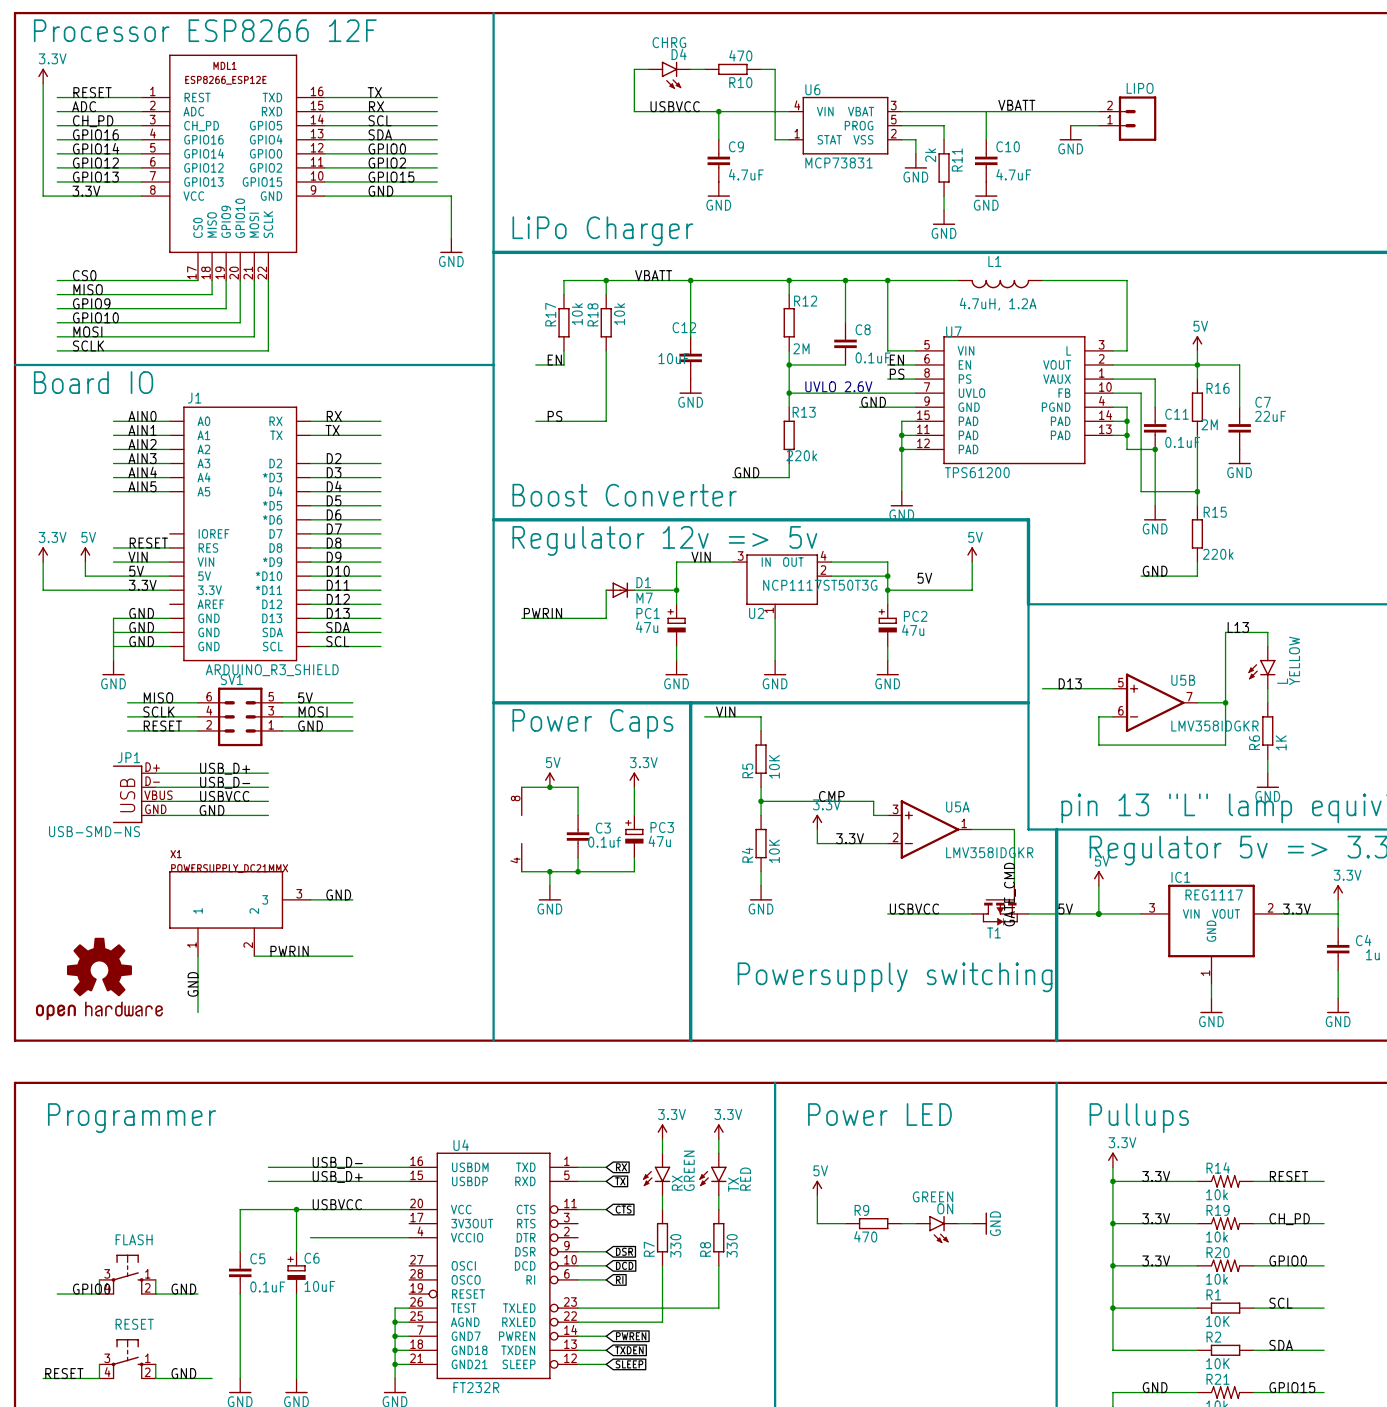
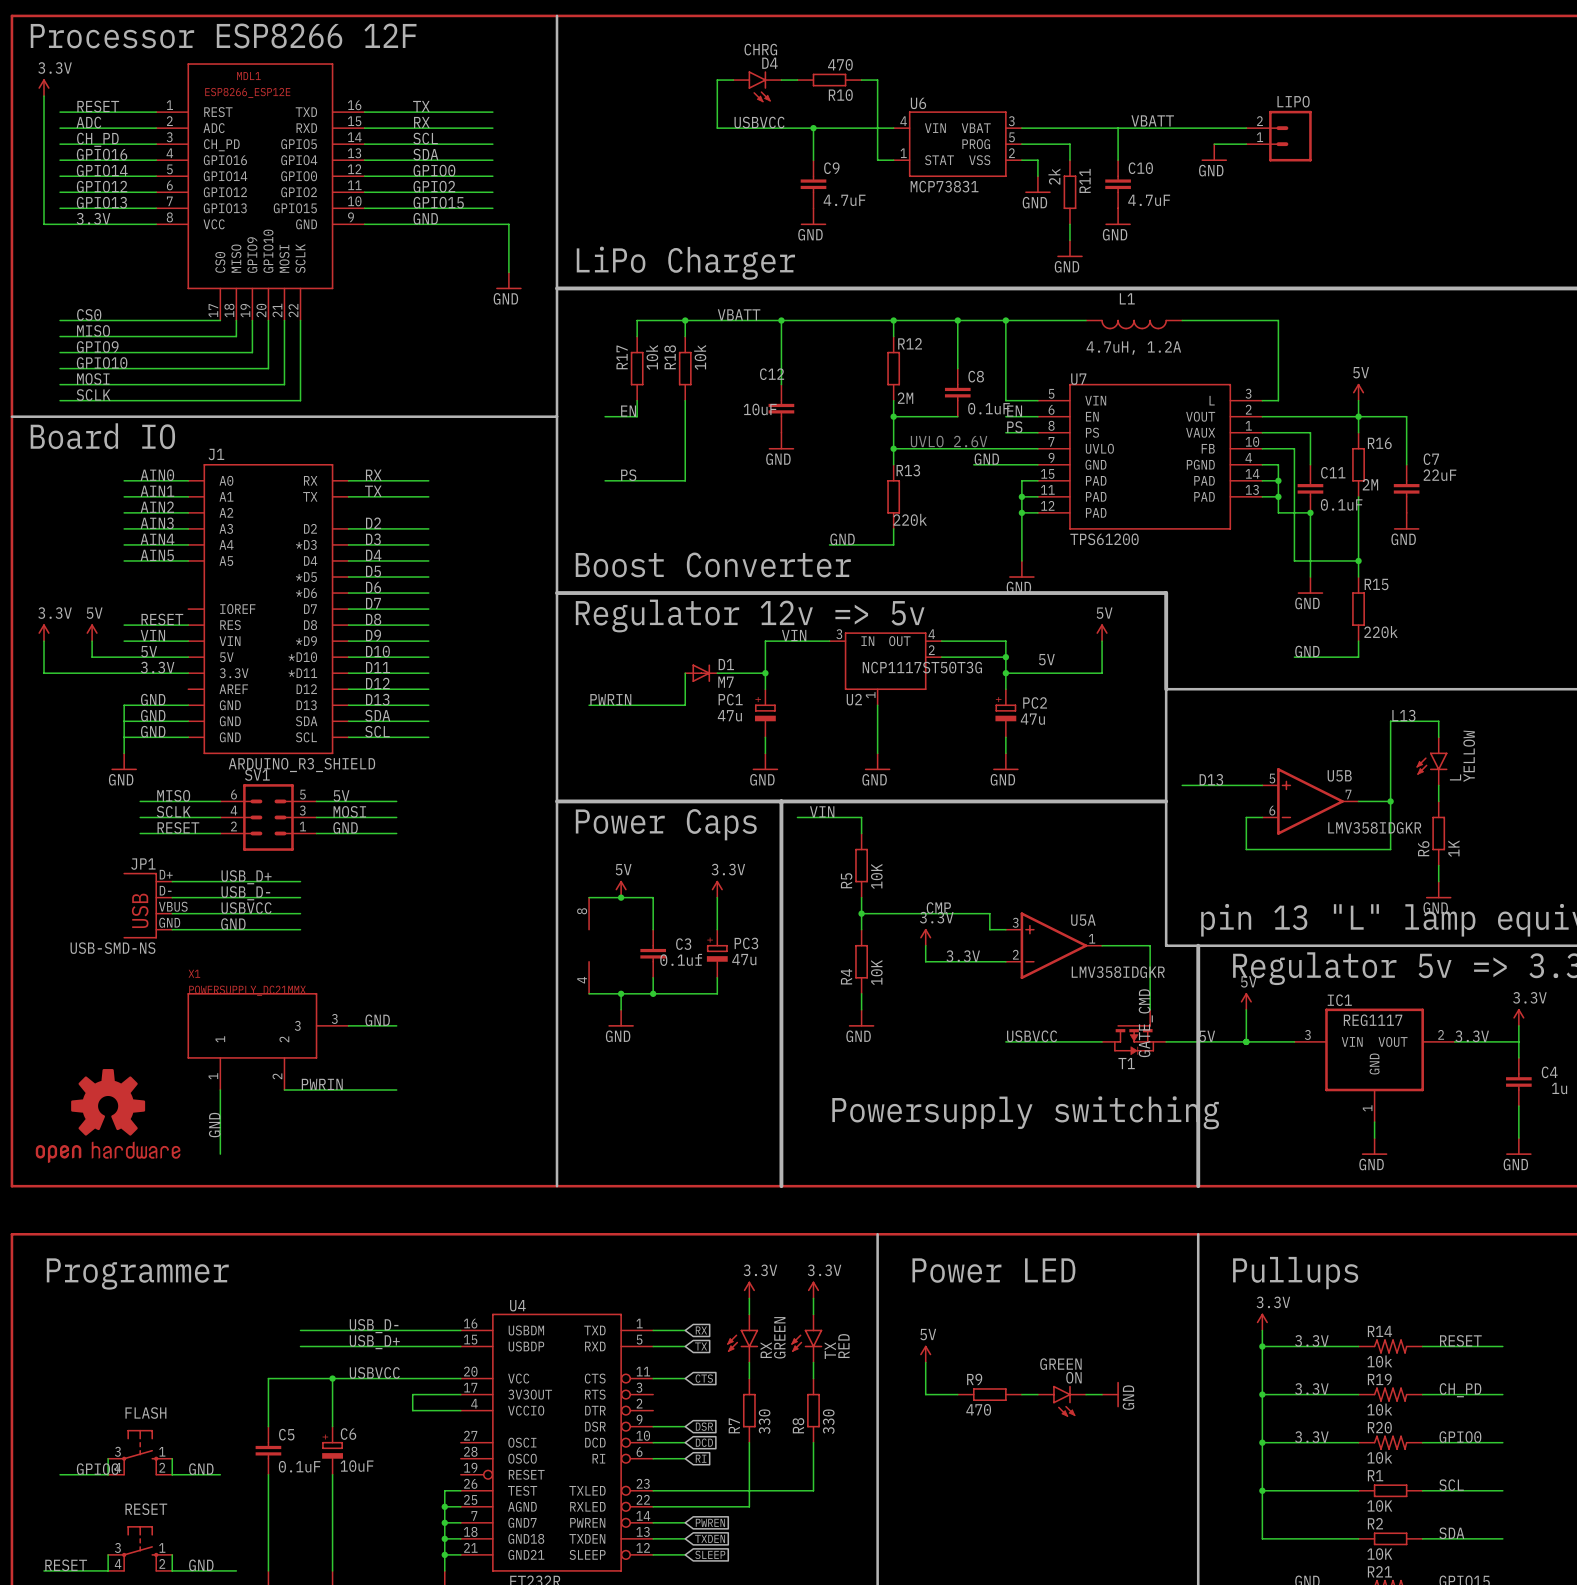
wire: (310, 1237) (366, 1237) -> (460, 1394) (412, 1394) (412, 1410)

